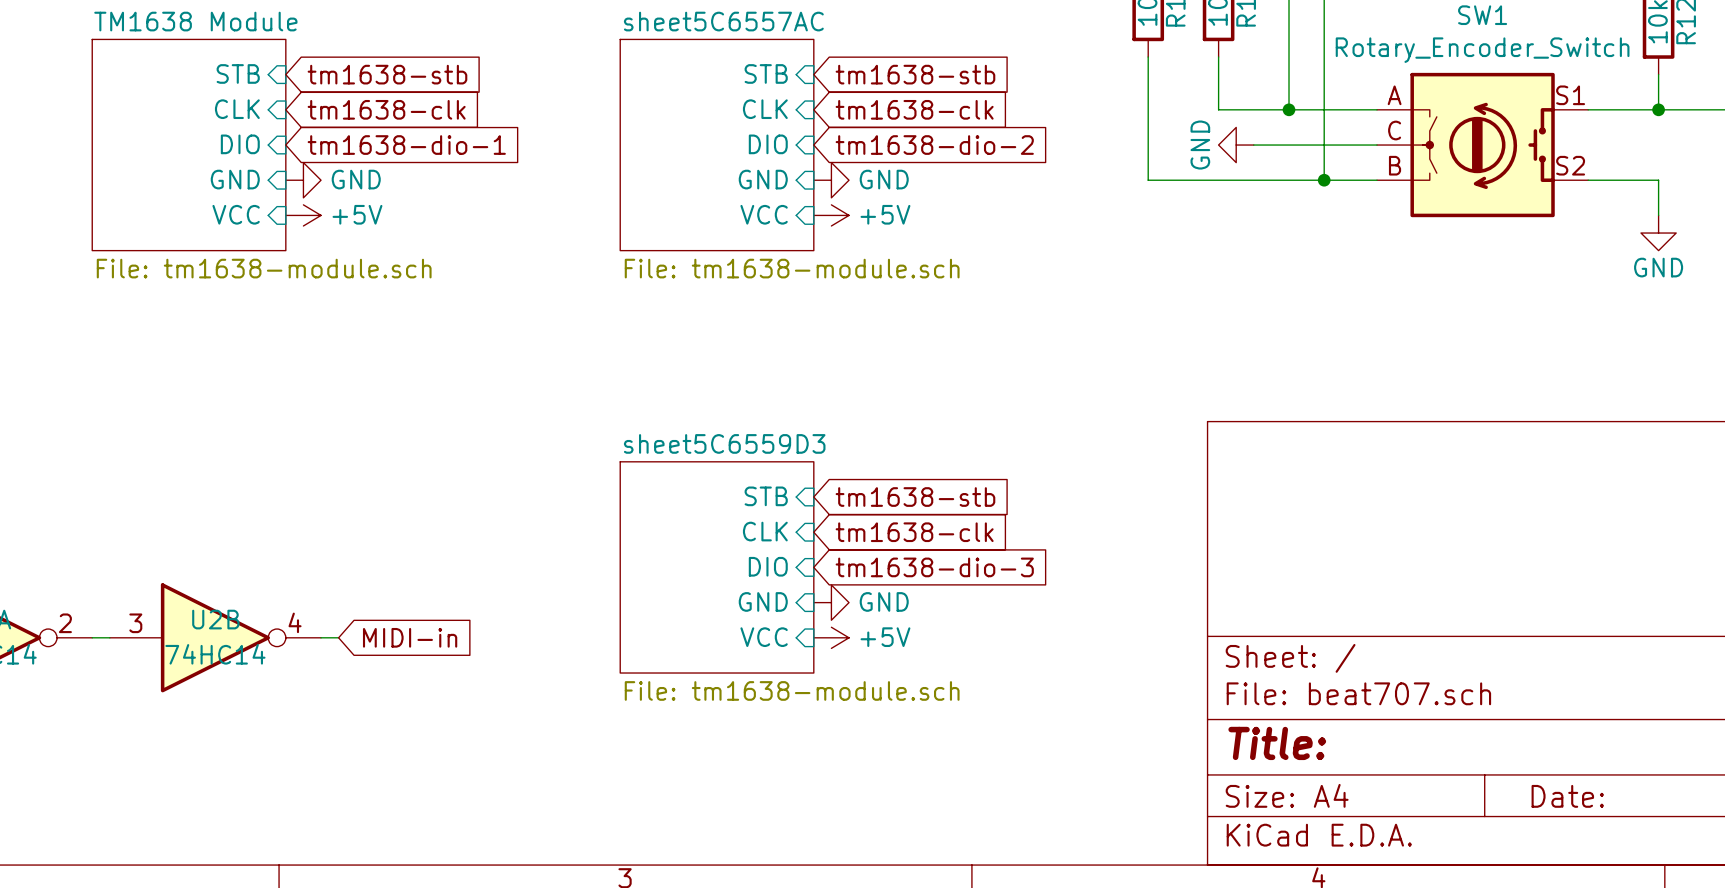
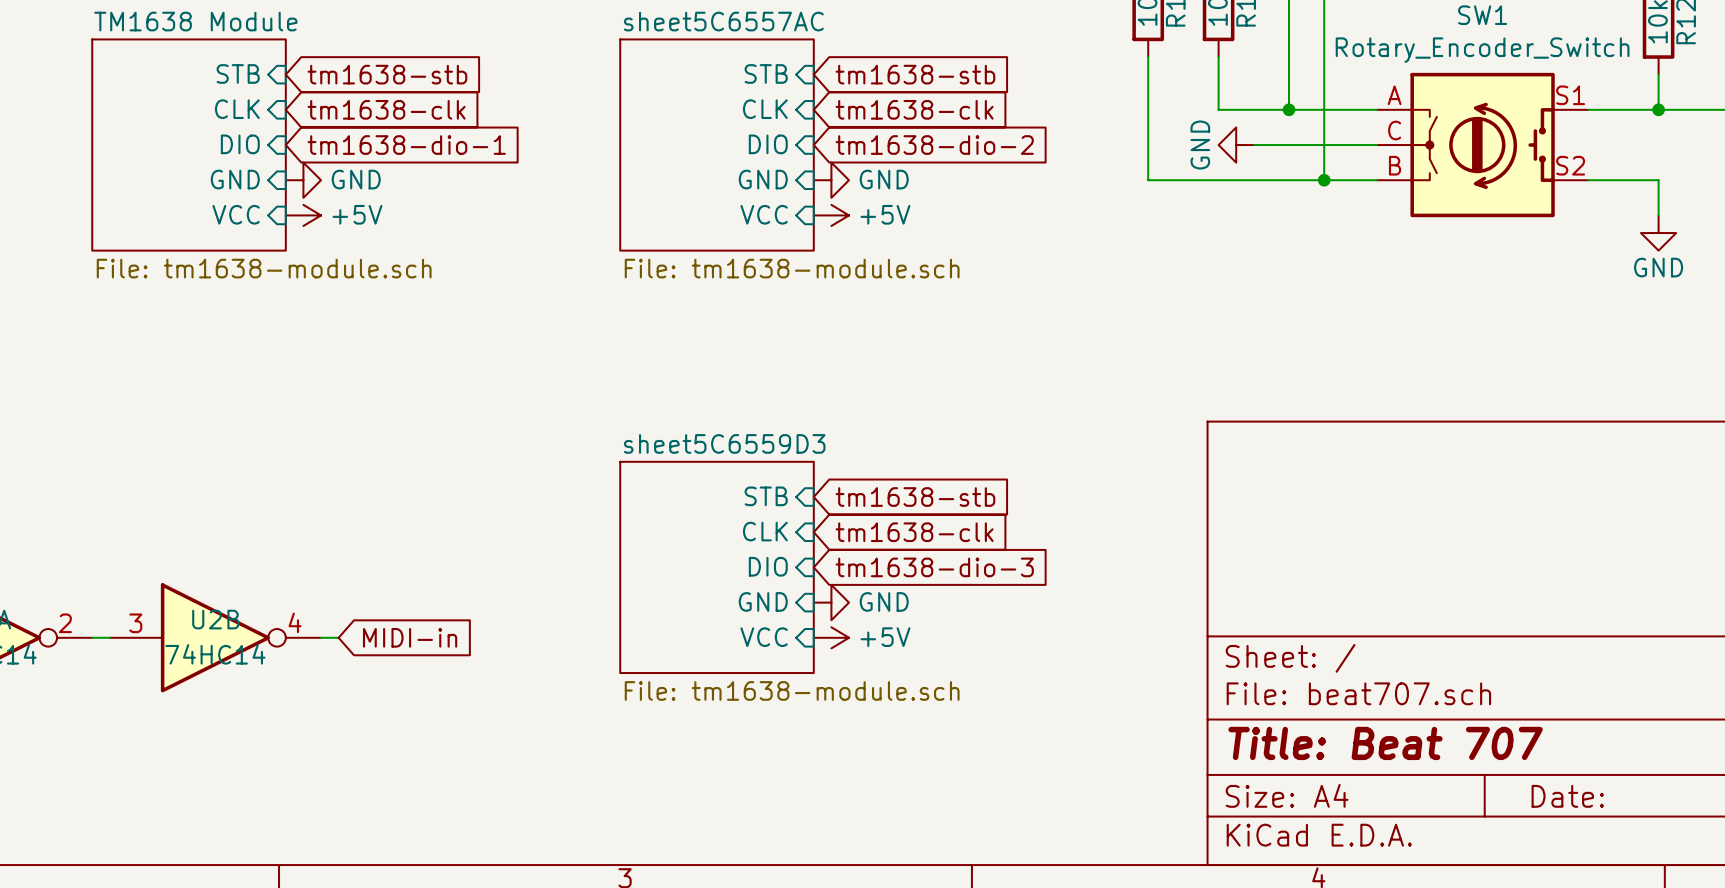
title block: Title: (1277, 743) -> Title: Beat 707 (1385, 743)

